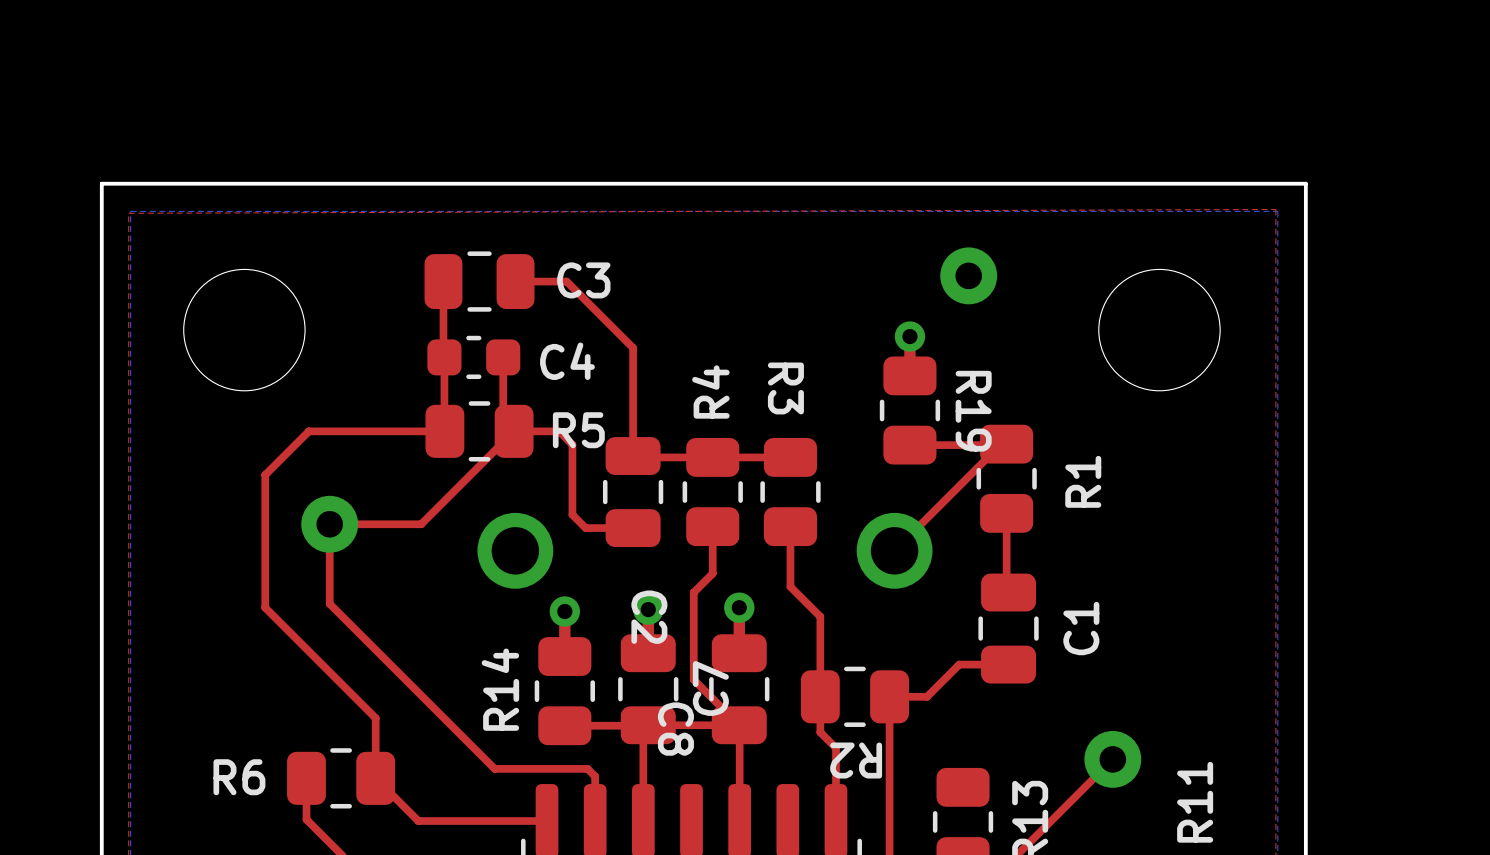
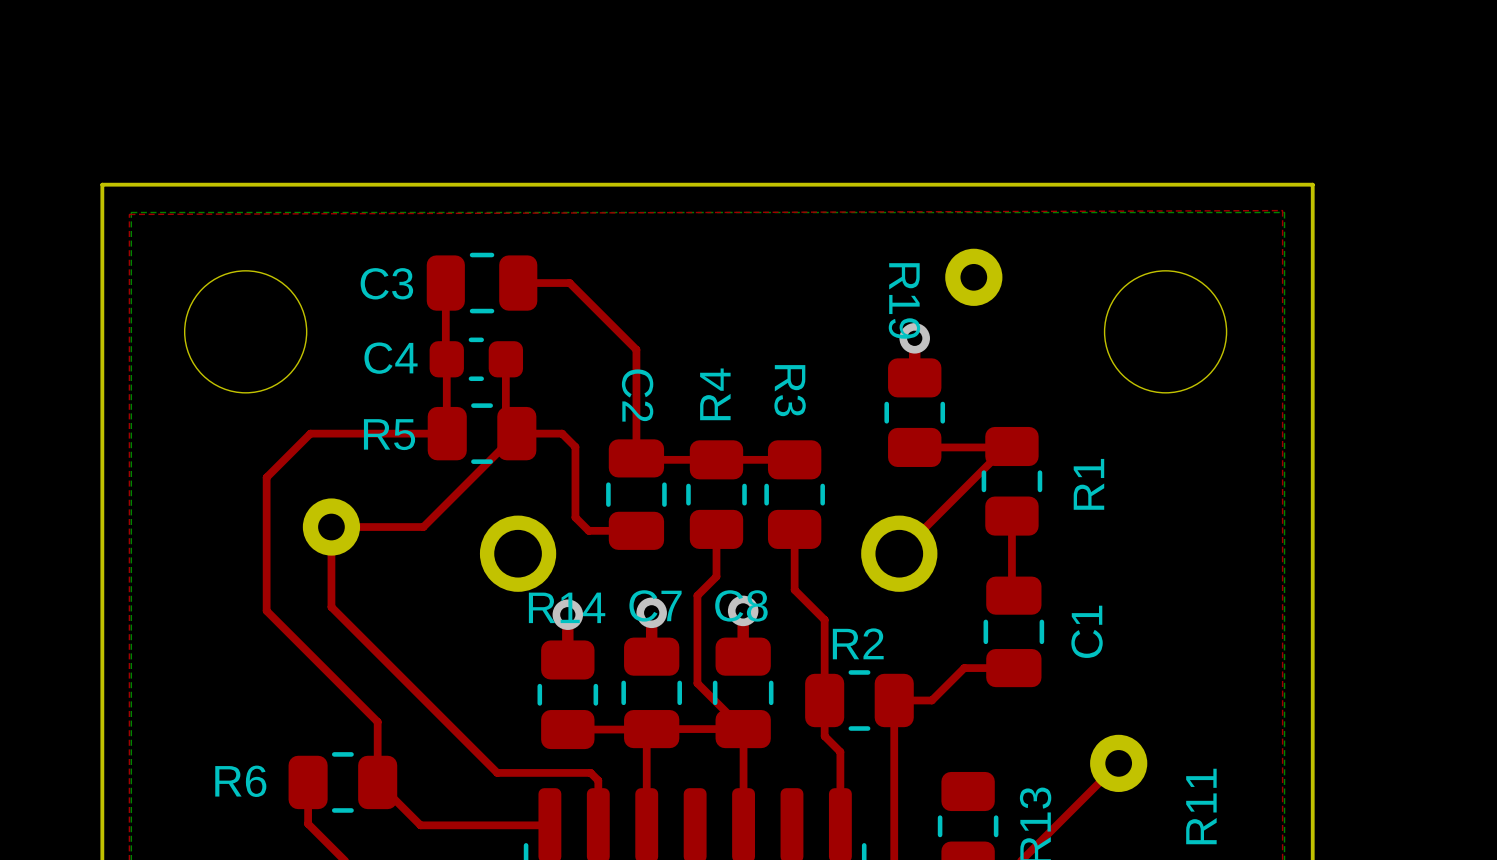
C3 name position: C3 (583, 280) -> C3 (386, 283)
C4 name position: C4 (567, 361) -> C4 (391, 358)
R19 name position: R19 (973, 411) -> R19 (904, 300)
R5 name position: R5 (578, 430) -> R5 (389, 434)
C2 name position: C2 (649, 617) -> C2 (637, 395)
C7 name rotation: 0° (710, 688) -> 90° clockwise (655, 605)
C7 name position: C7 (710, 688) -> C7 (655, 605)
R14 name rotation: 0° (500, 689) -> 90° clockwise (567, 607)
C8 name rotation: 0° (675, 729) -> 90° counterclockwise (741, 605)
C8 name position: C8 (675, 729) -> C8 (741, 605)
R2 name rotation: 0° (856, 760) -> 180° (858, 643)
R2 name position: R2 (856, 760) -> R2 (858, 643)

